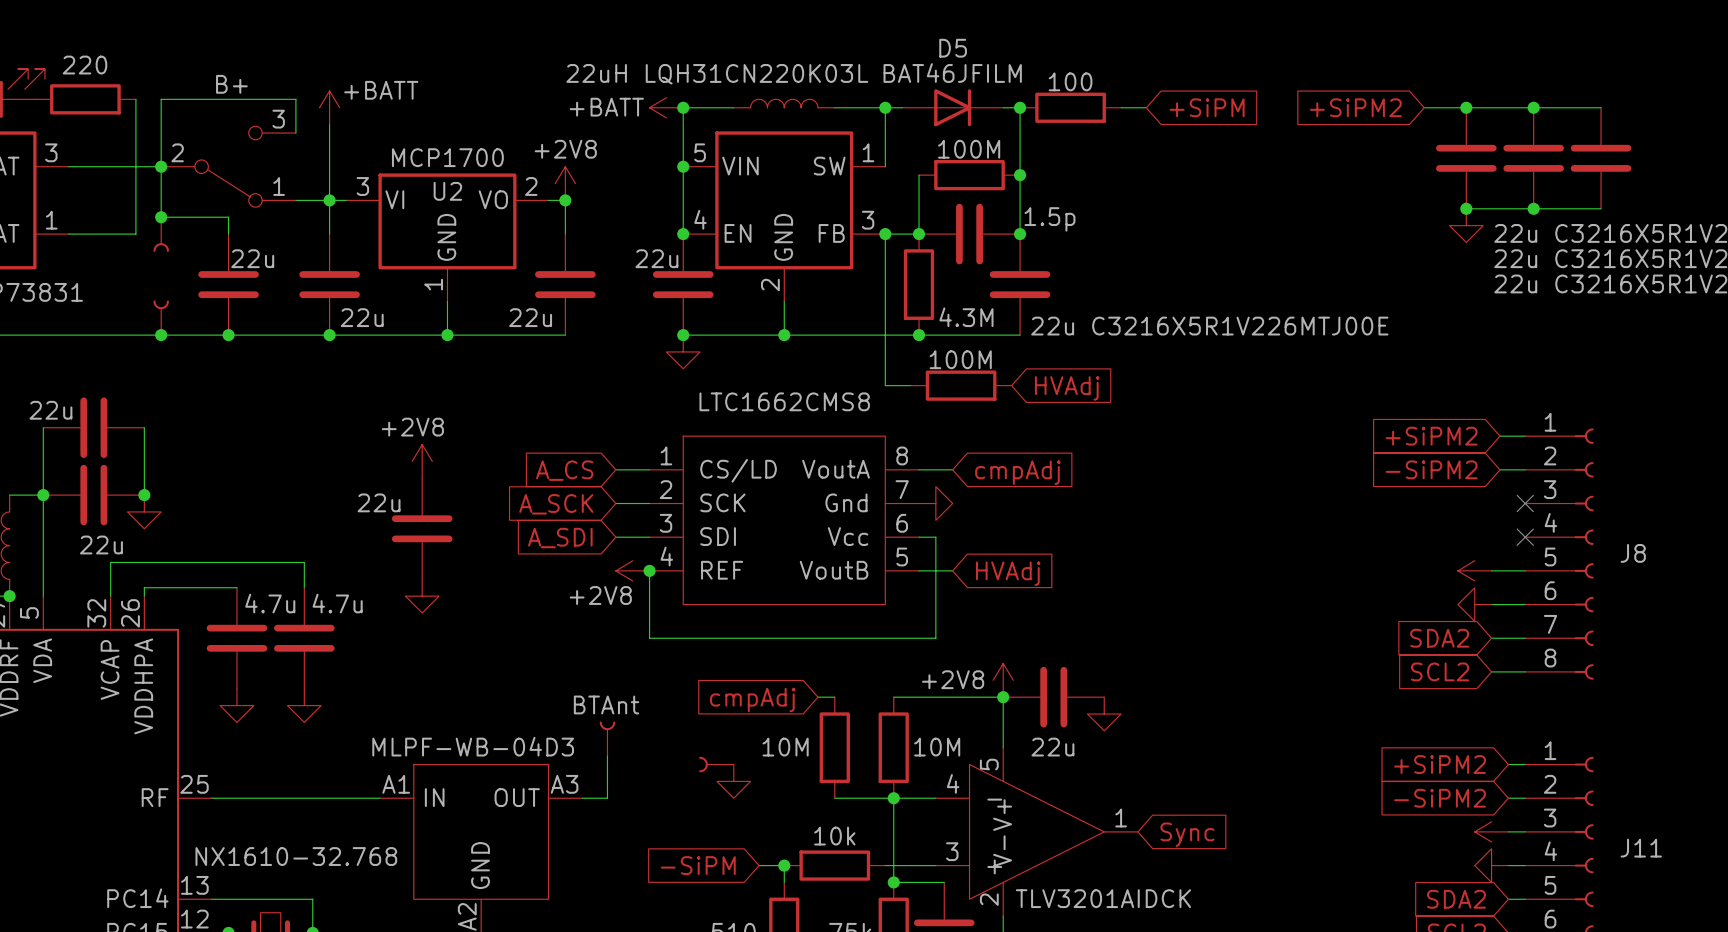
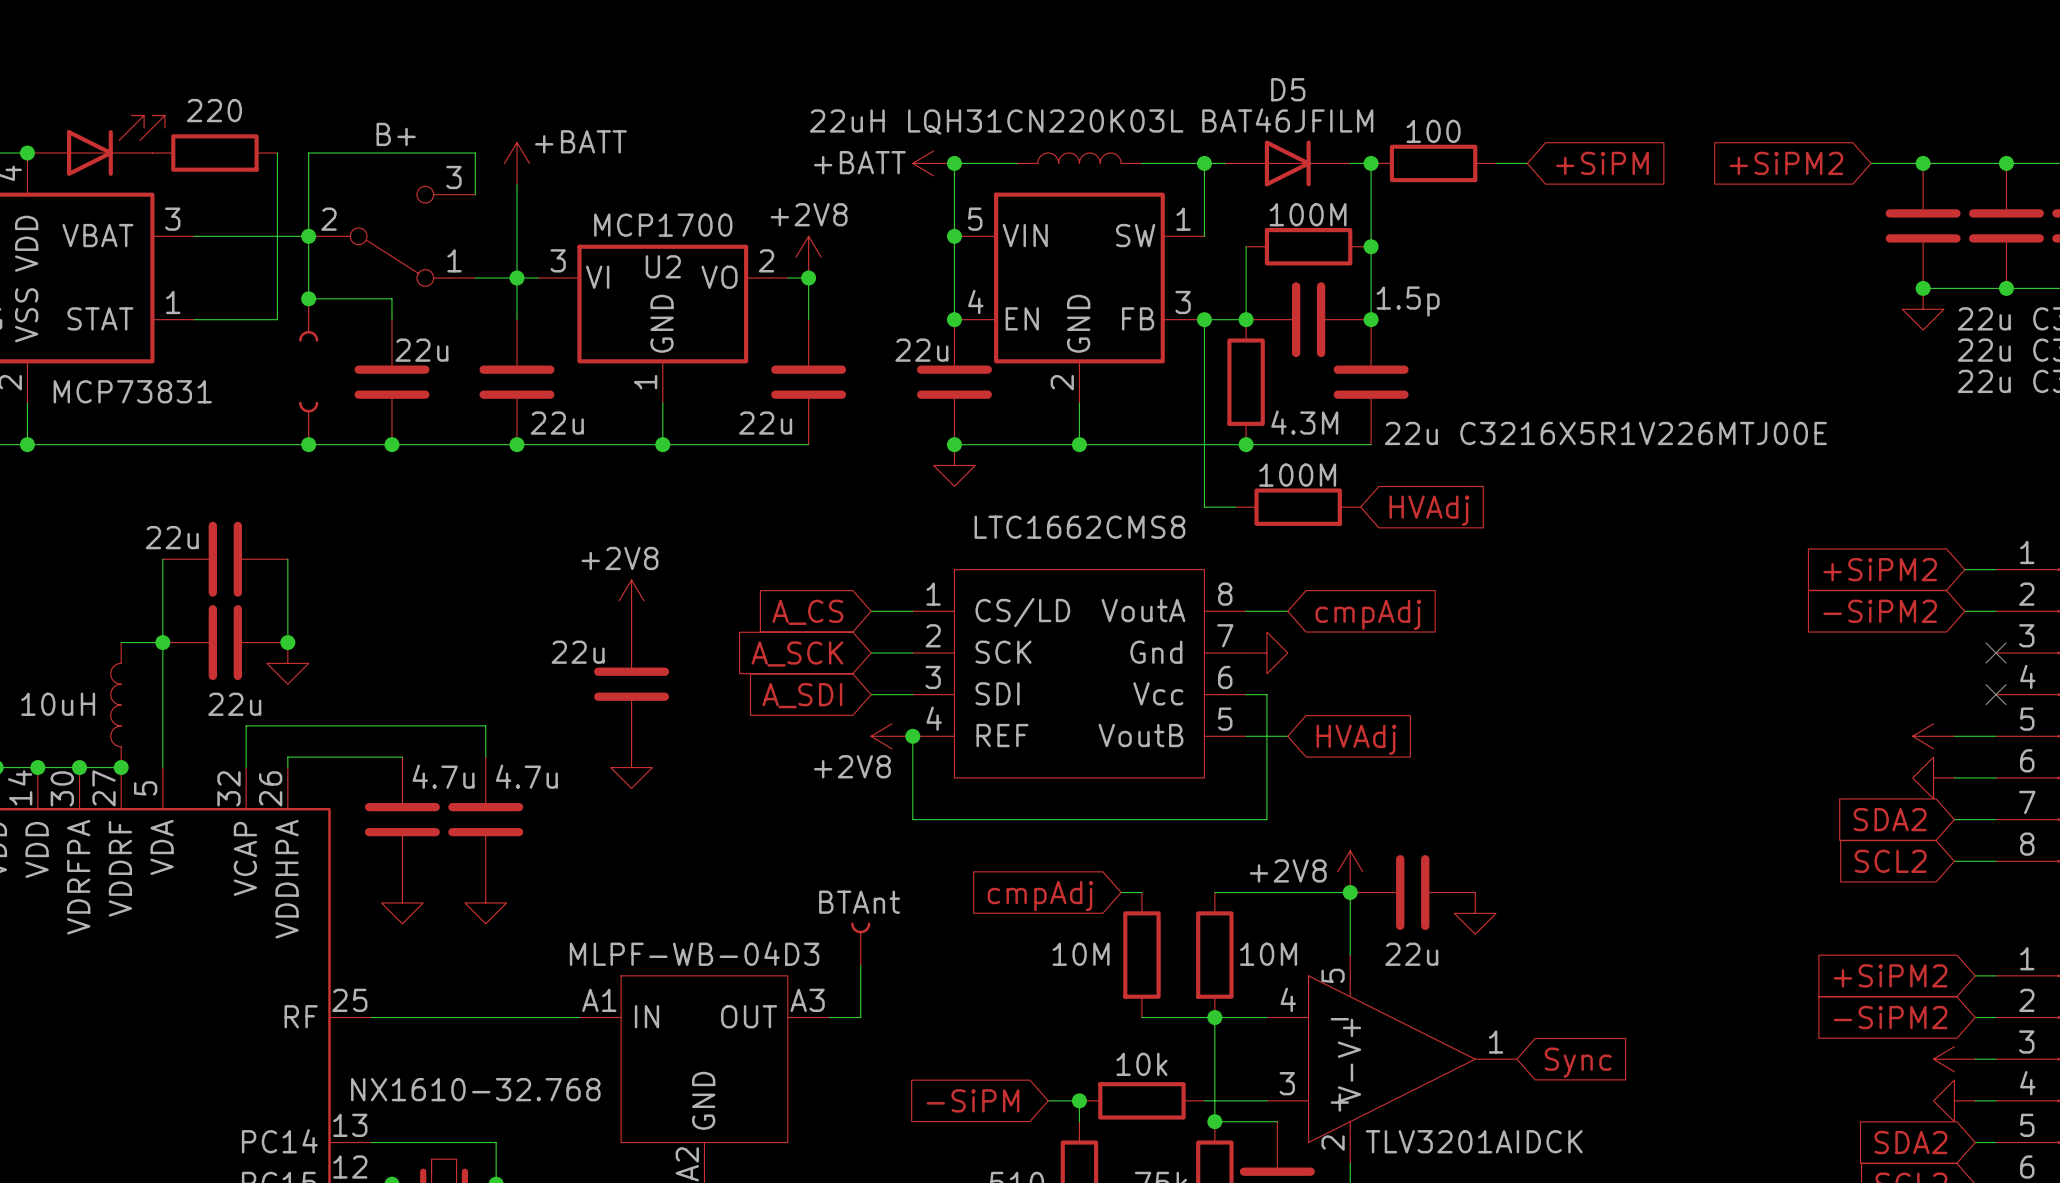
part: (716, 764) -> none
power symbol: (733, 781) -> none

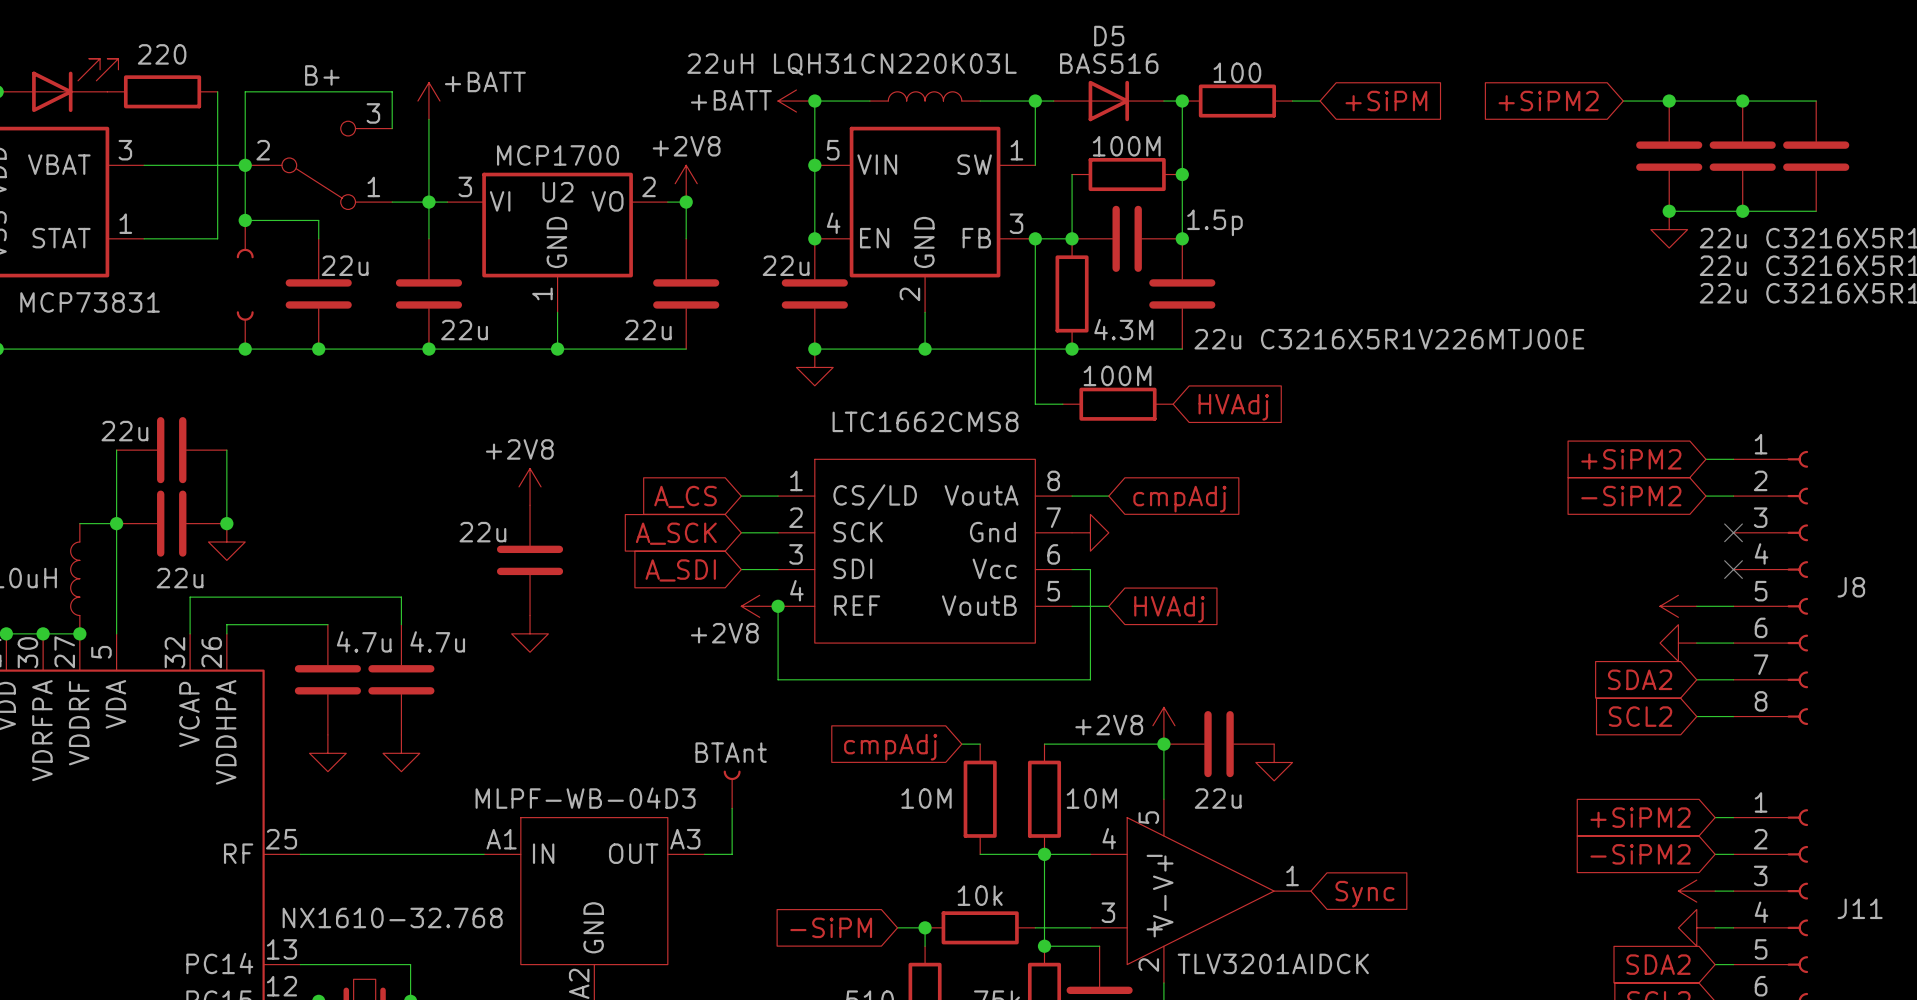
D5 value: BAT46JFILM (1287, 120) -> BAS516 (1109, 63)

